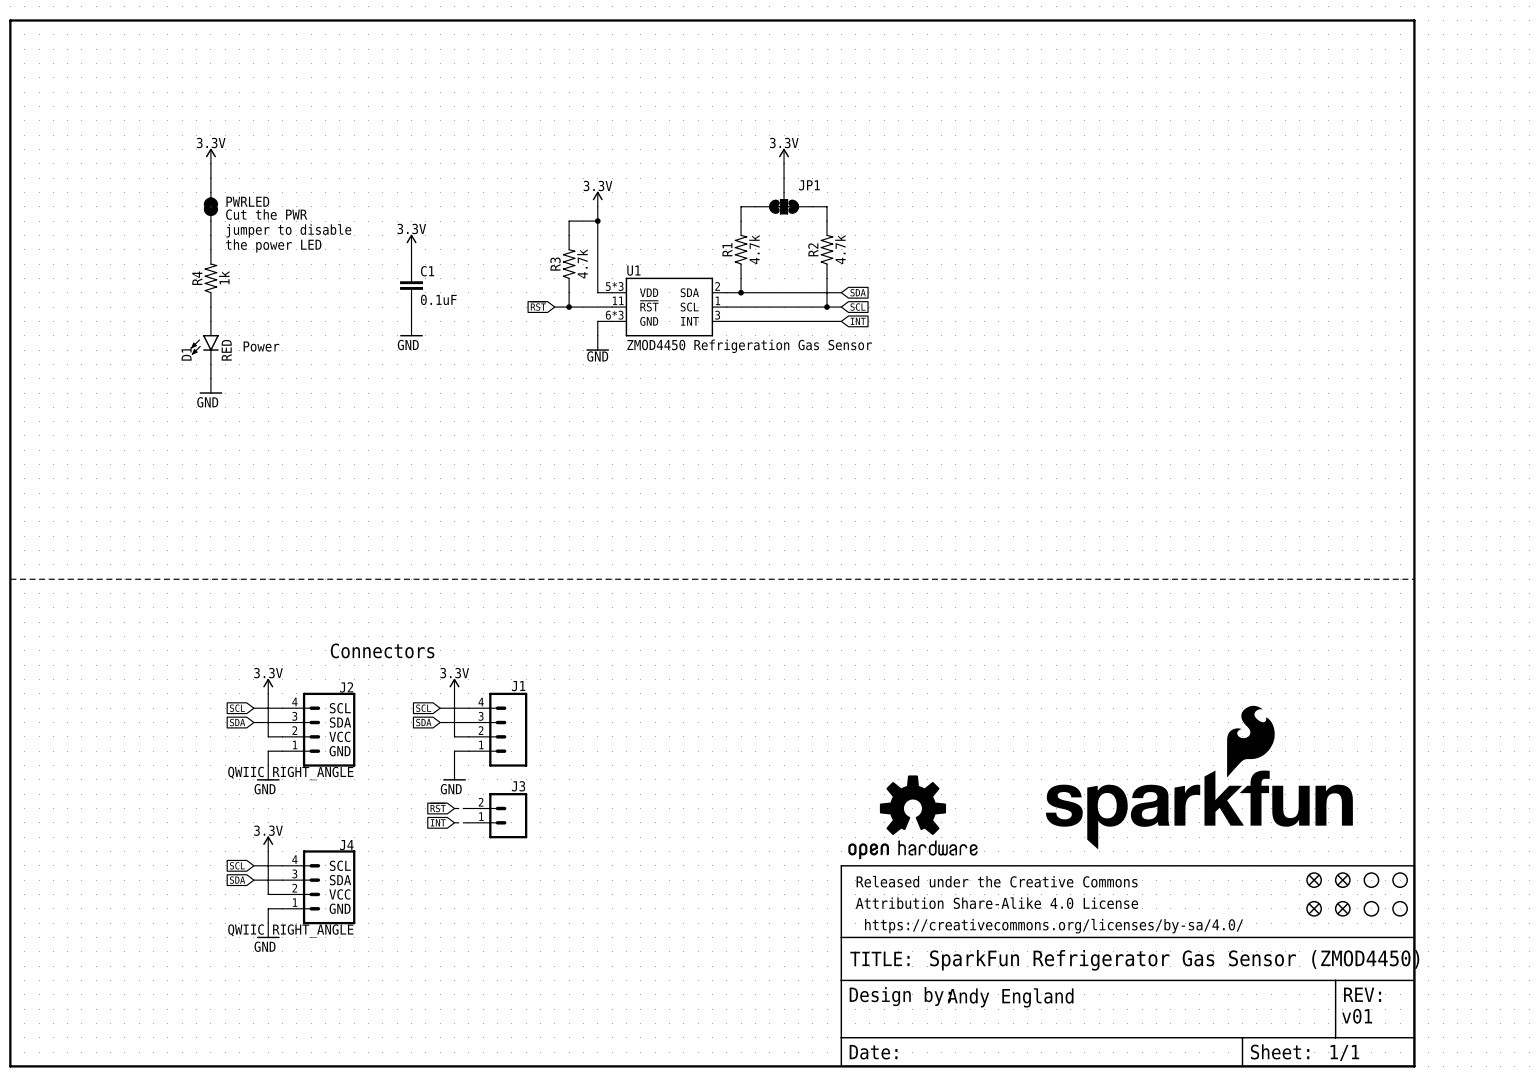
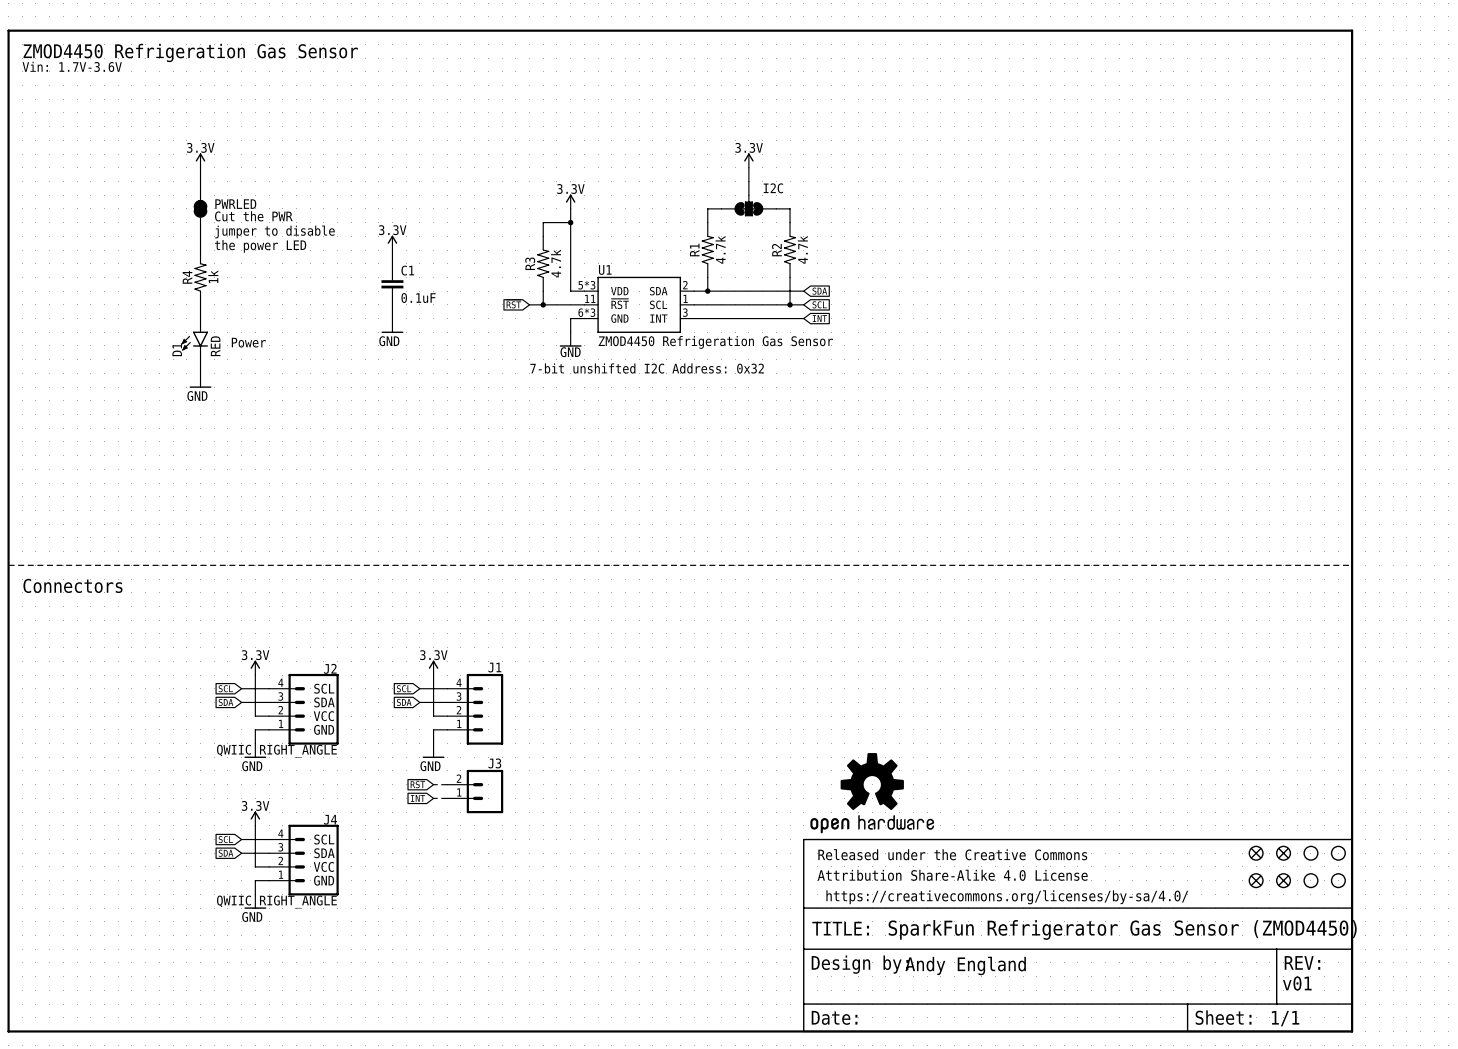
text: none -> ZMOD4450 Refrigeration Gas Sensor (190, 52)
text: none -> Vin: 1.7V-3.6V (72, 66)
JP1 name: JP1 (809, 185) -> I2C (773, 188)
text: none -> 7-bit unshifted I2C Address: 0x32 (647, 368)
text: none -> Connectors (72, 585)
text: Connectors (382, 650) -> none
part: (1199, 777) -> none

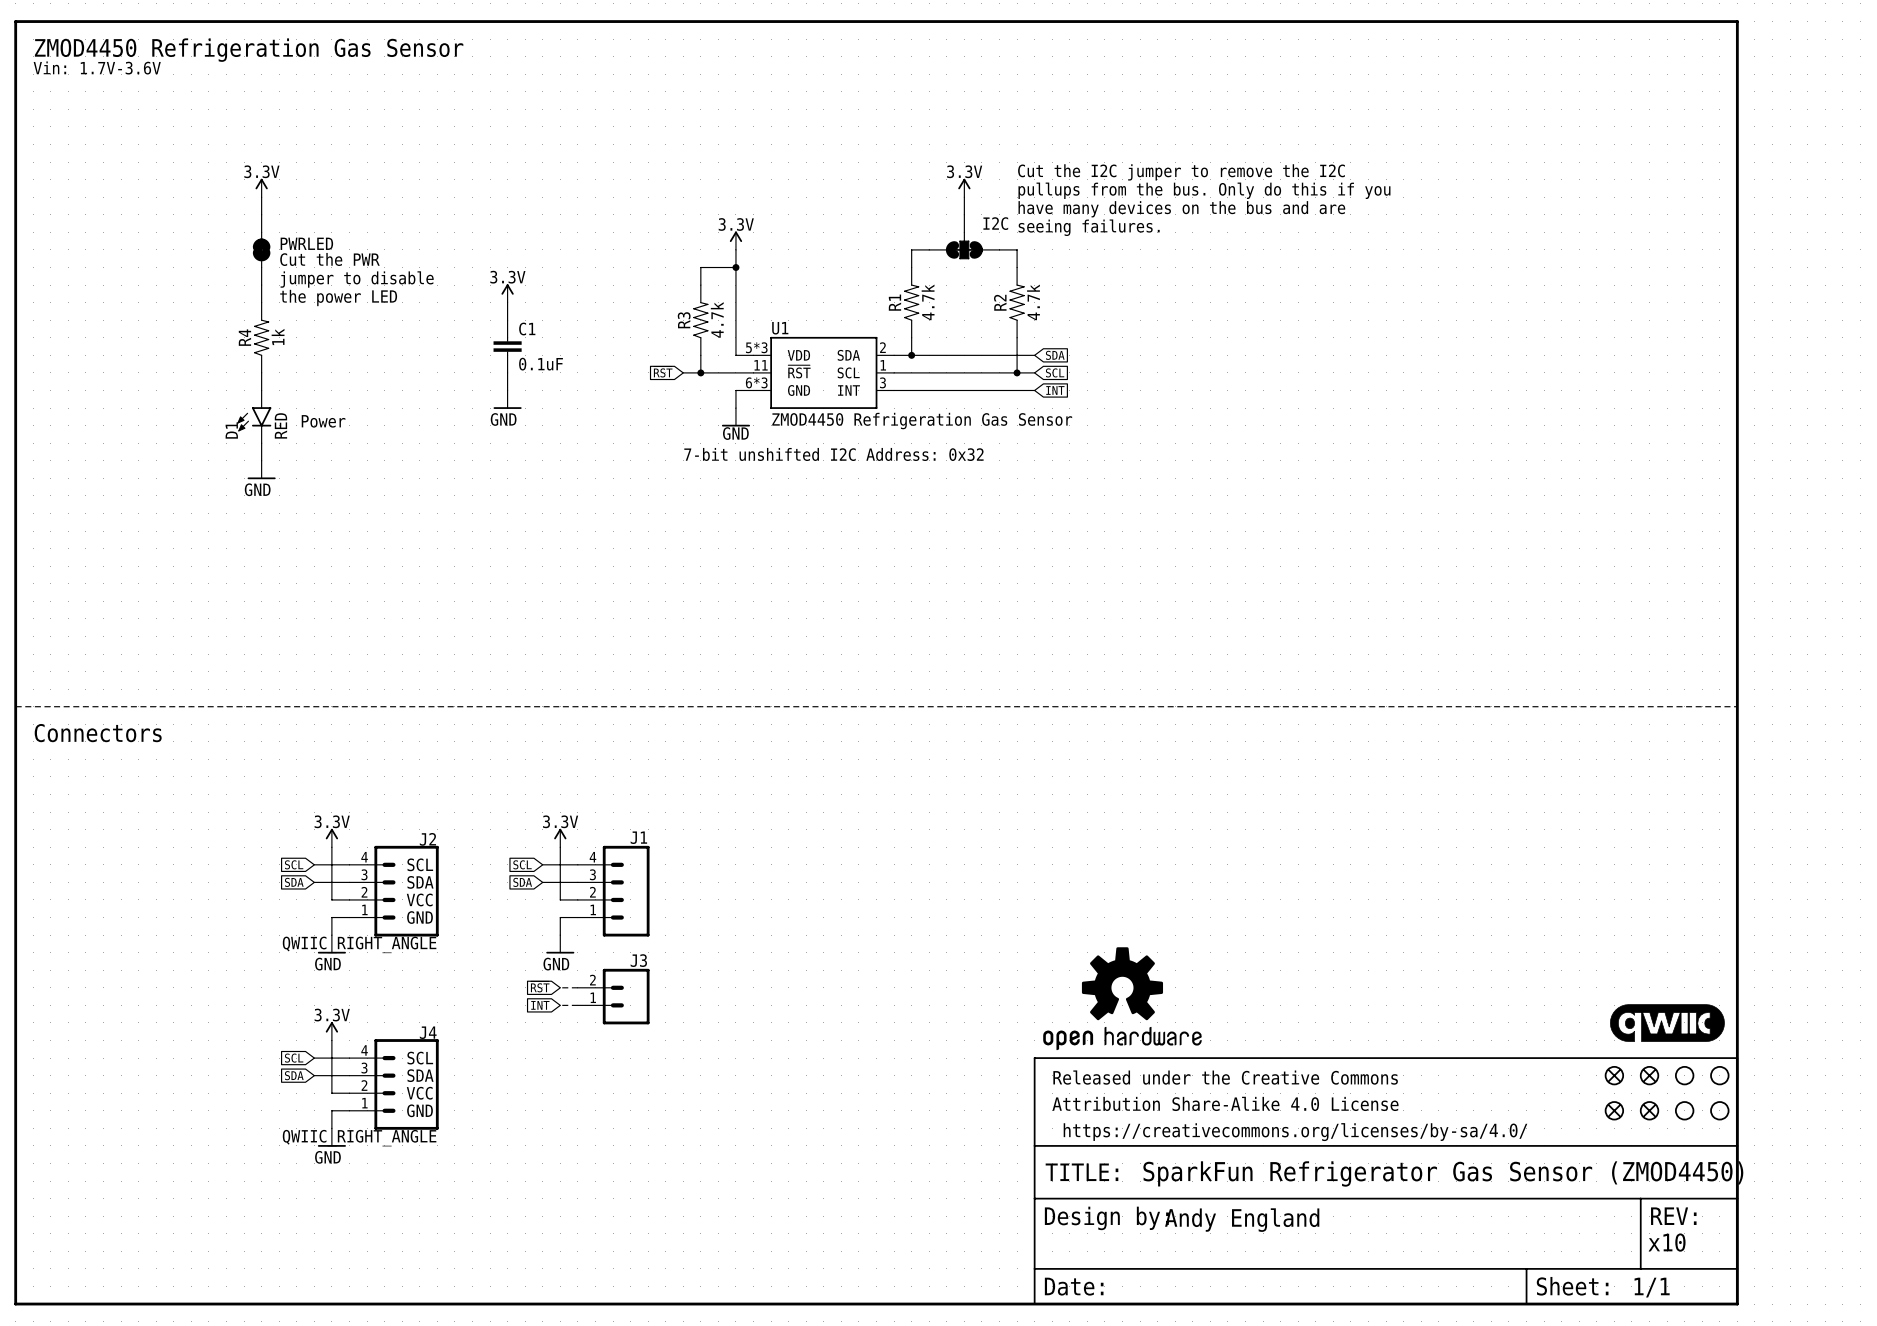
text: none -> Cut the I2C jumper to remove the I2C (1181, 172)
text: none -> pullups from the bus. Only do this if you (1204, 190)
text: none -> have many devices on the bus and are (1181, 209)
text: none -> seeing failures. (1089, 227)
part: none -> (1667, 1023)
text: v01 (1297, 983) -> x10 (1667, 1242)

